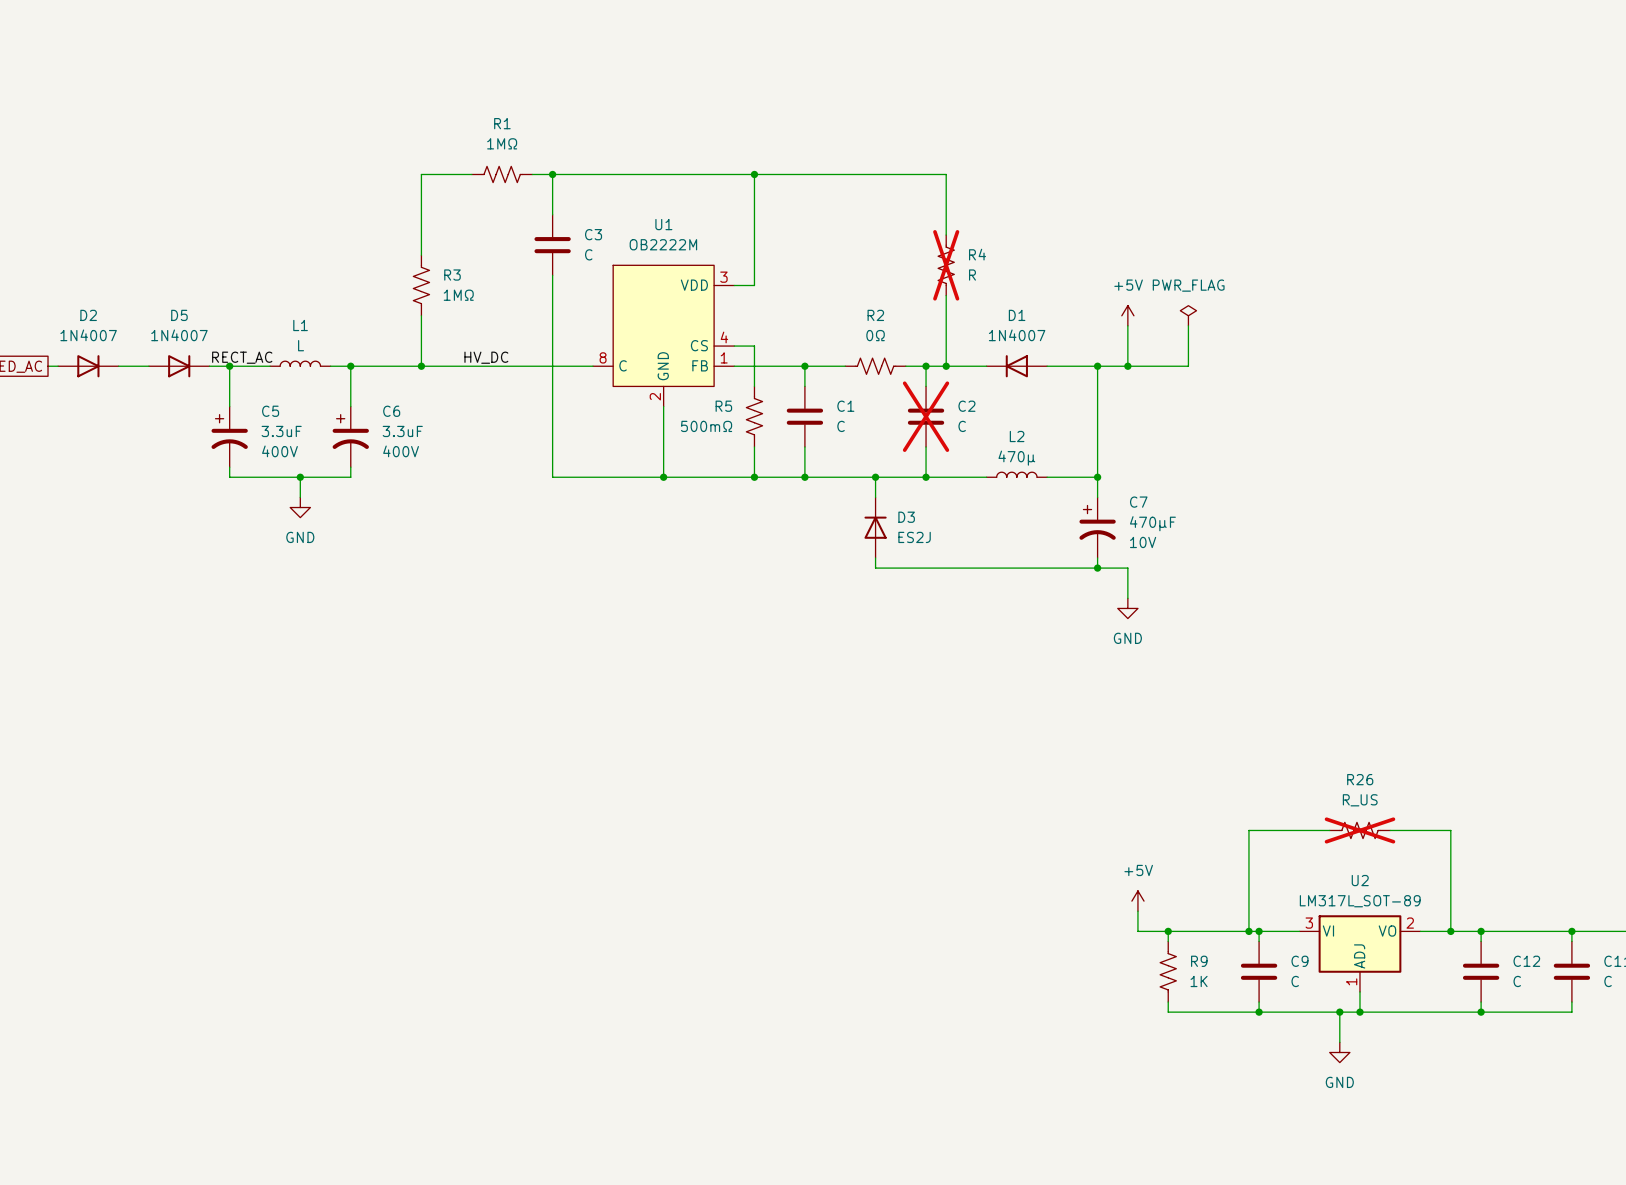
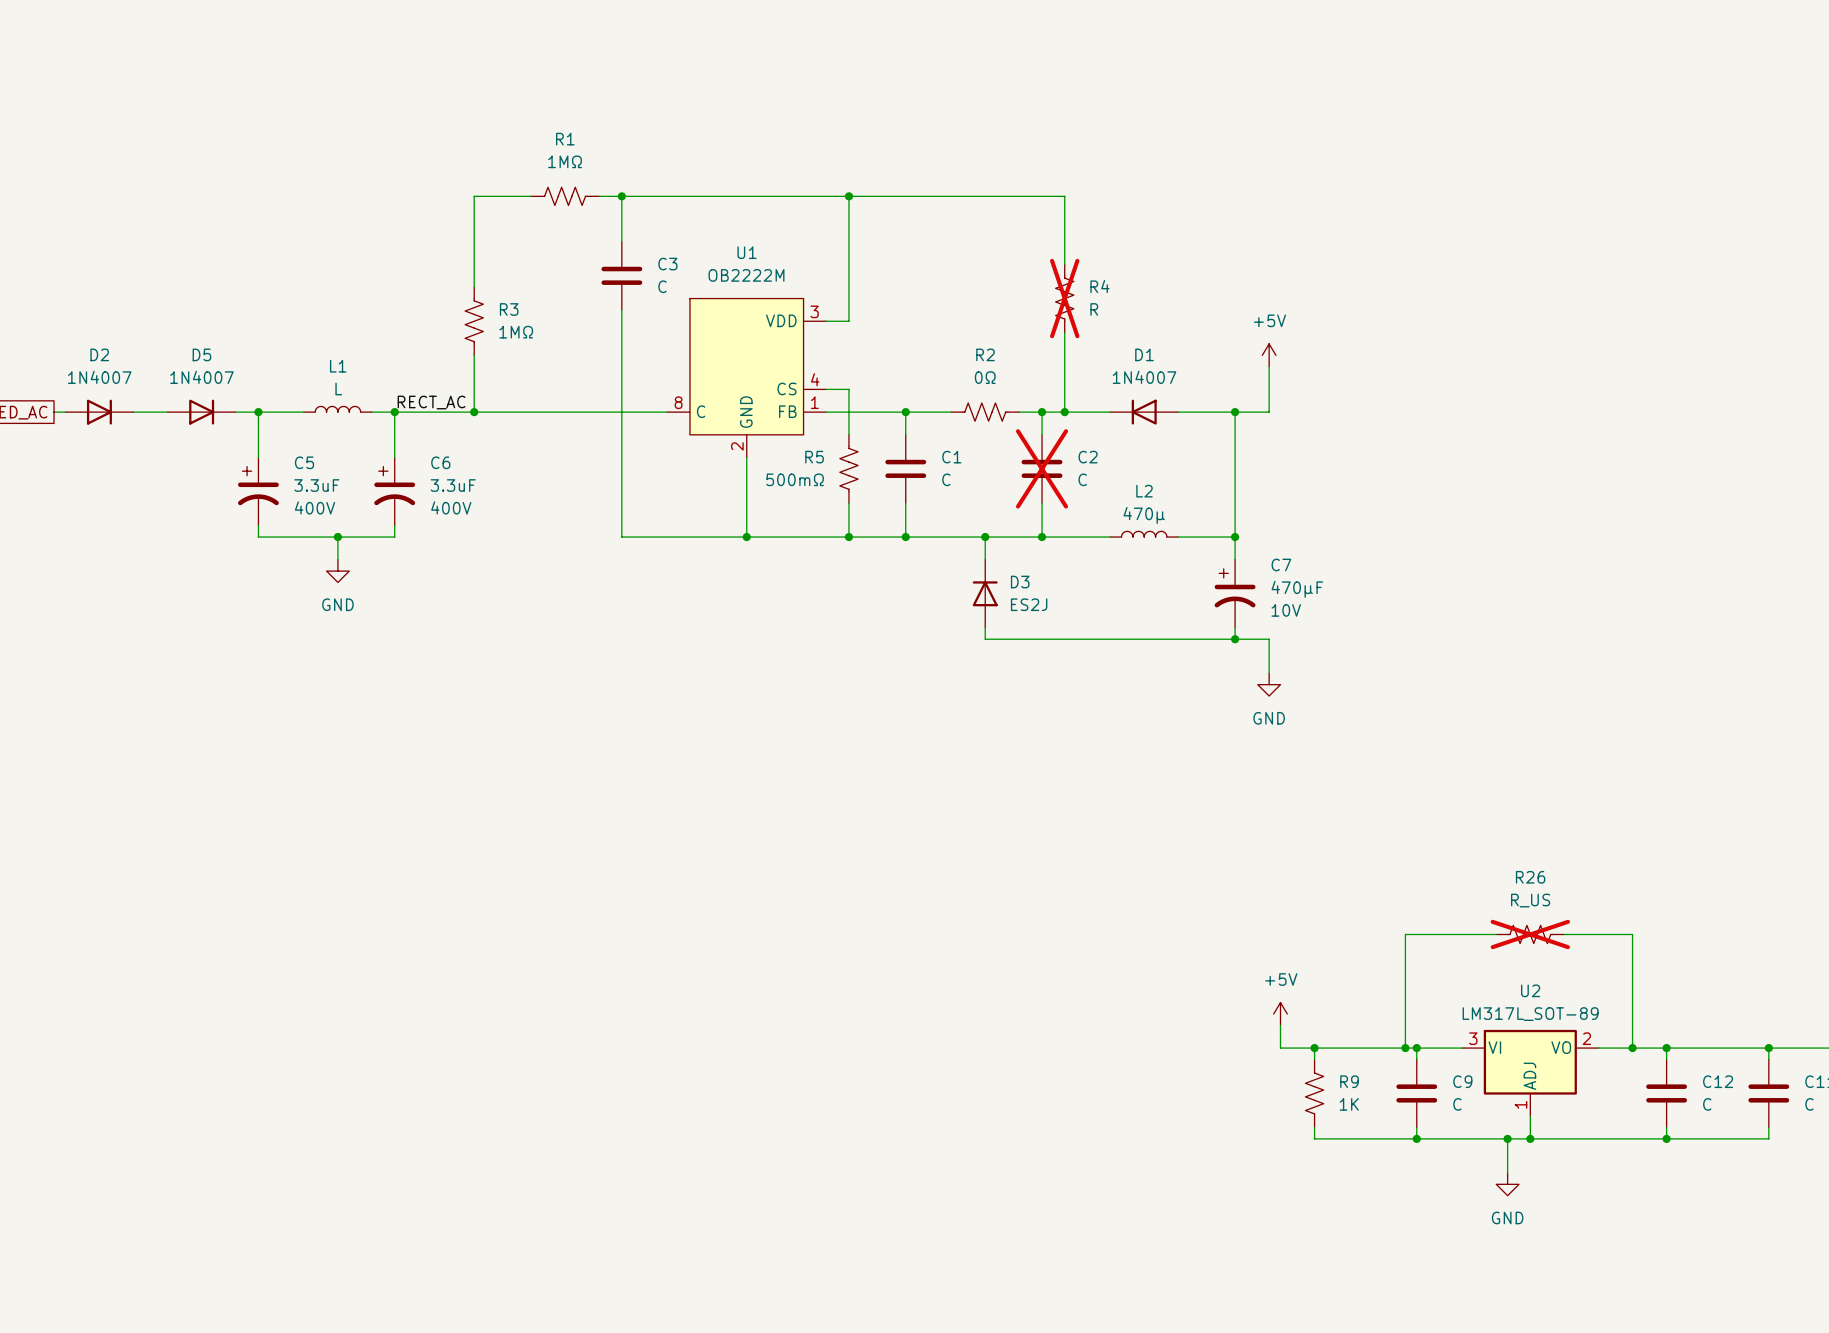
power symbol: PWR_FLAG (1188, 315) -> none
wire: (1188, 325) (1188, 366) (1127, 366) -> none
label position: RECT_AC (242, 357) -> RECT_AC (431, 402)
label: HV_DC (486, 357) -> none
junction: (1127, 366) -> none

